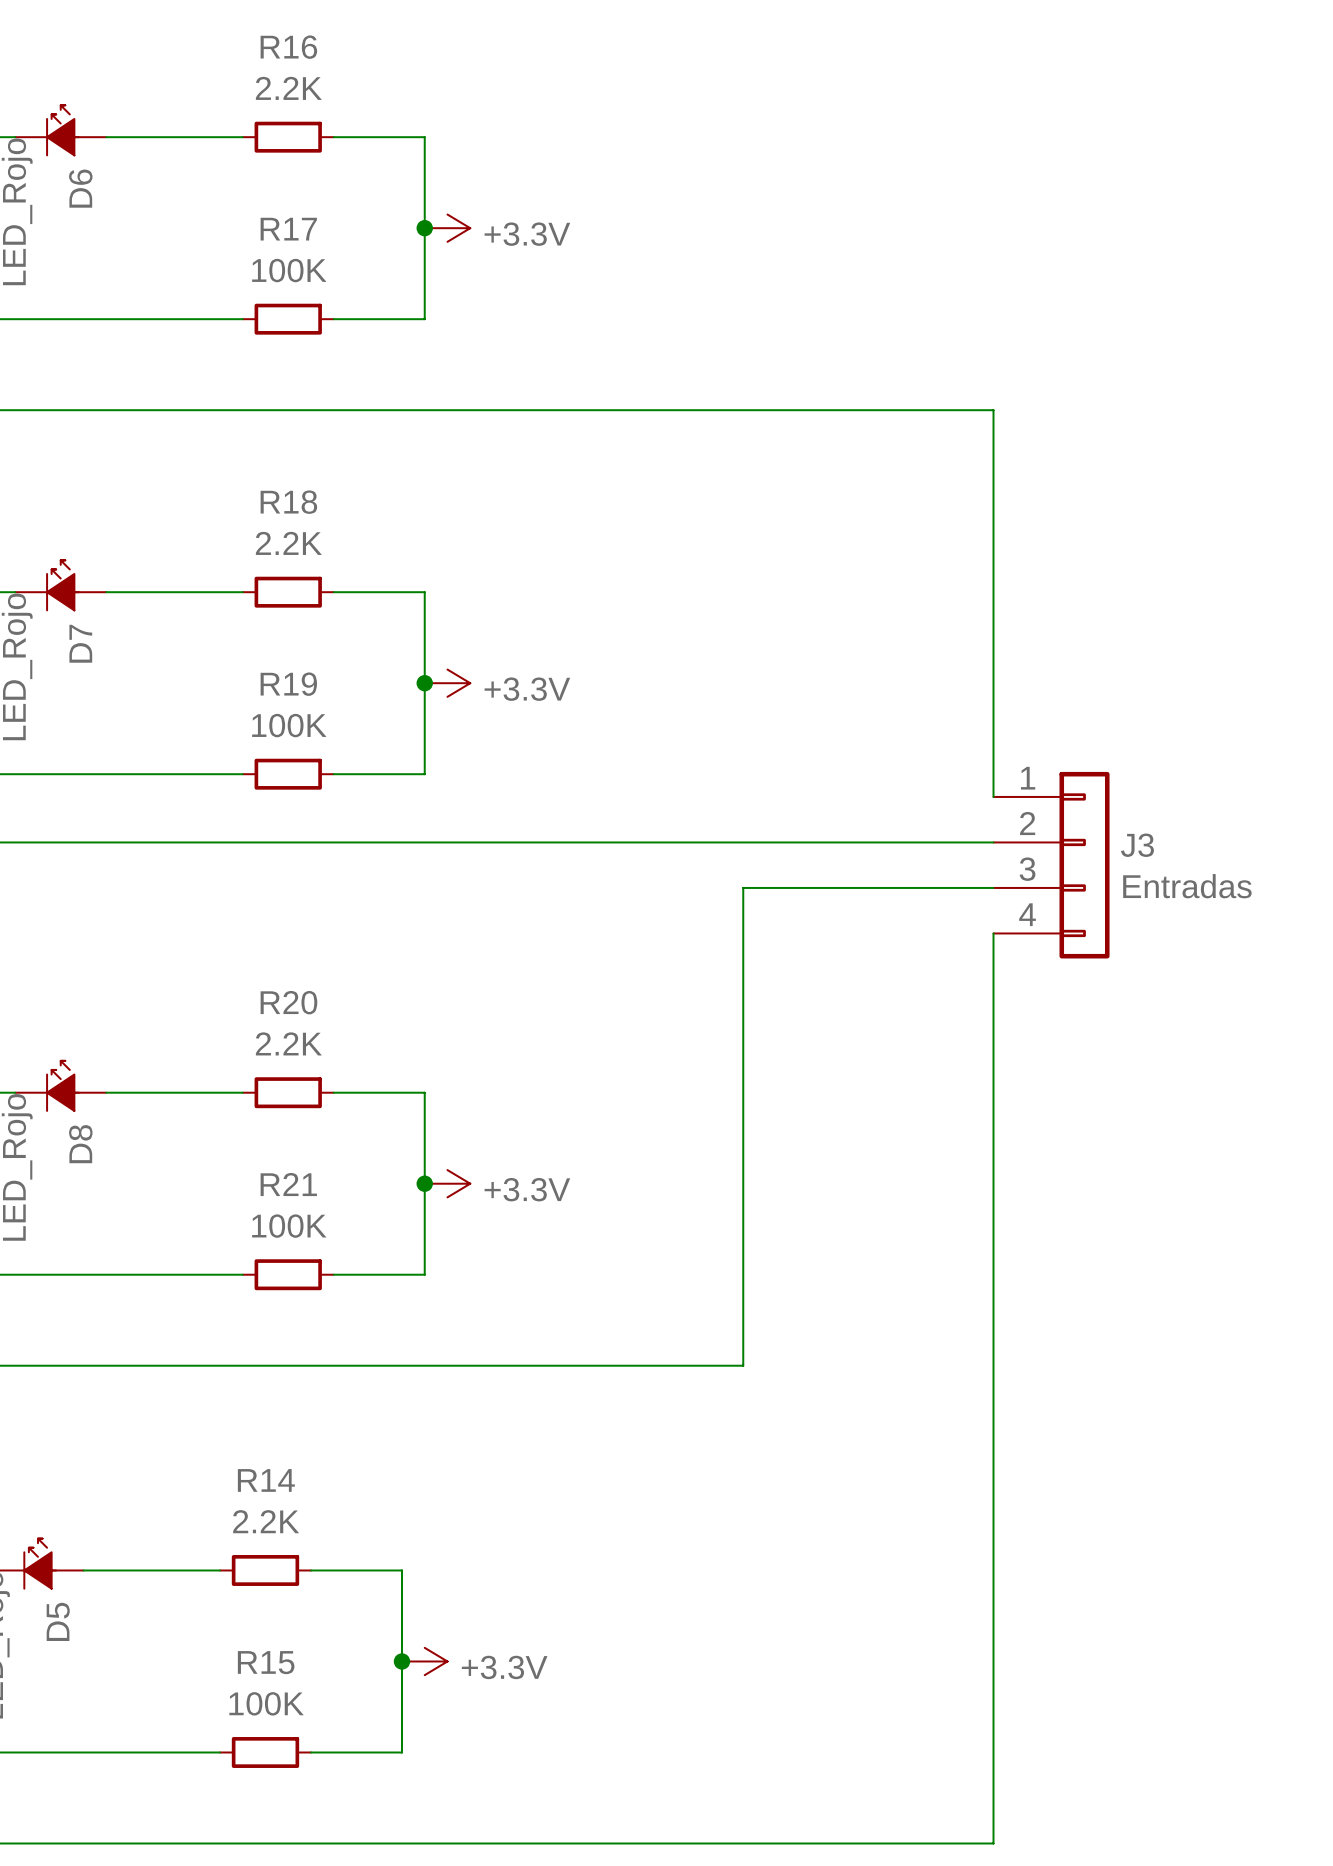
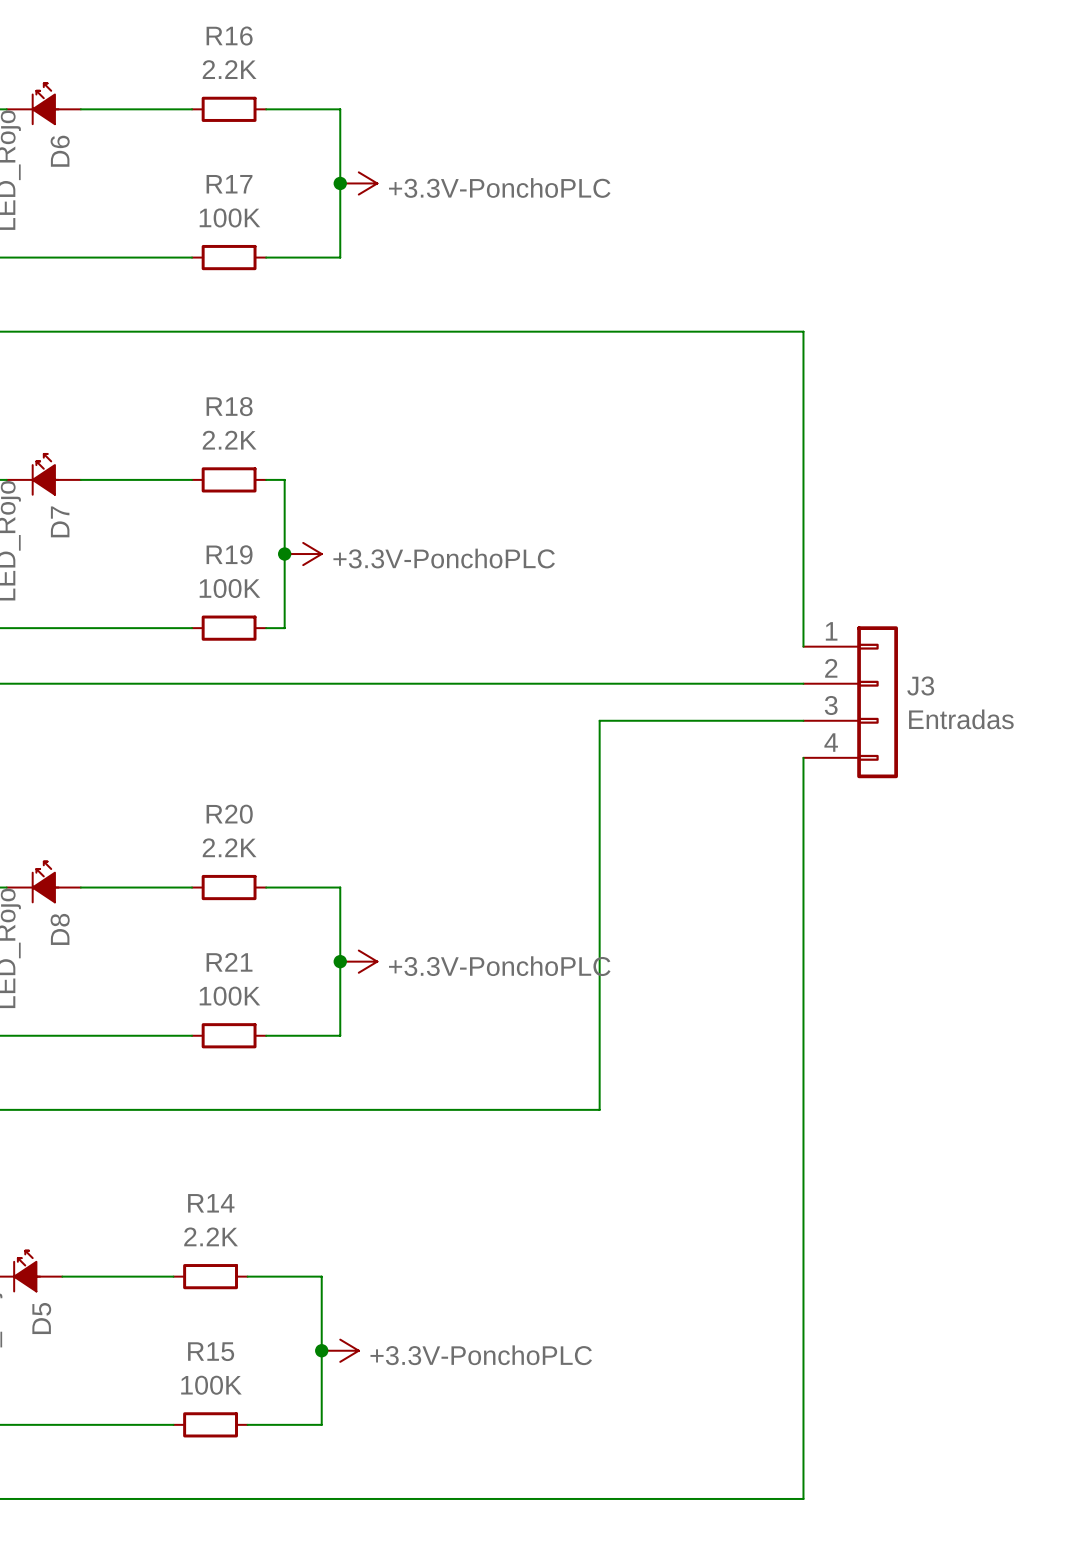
power symbol: +3.3V (447, 228) -> +3.3V-PonchoPLC (358, 183)
wire: (356, 592) (424, 592) (424, 774) (356, 774) -> (284, 479) (284, 628)
power symbol: none -> +3.3V-PonchoPLC (303, 554)
junction position: (424, 683) -> (284, 554)
power symbol: +3.3V (447, 683) -> none
power symbol: +3.3V (447, 1183) -> +3.3V-PonchoPLC (358, 961)
power symbol: +3.3V (424, 1661) -> +3.3V-PonchoPLC (340, 1350)

